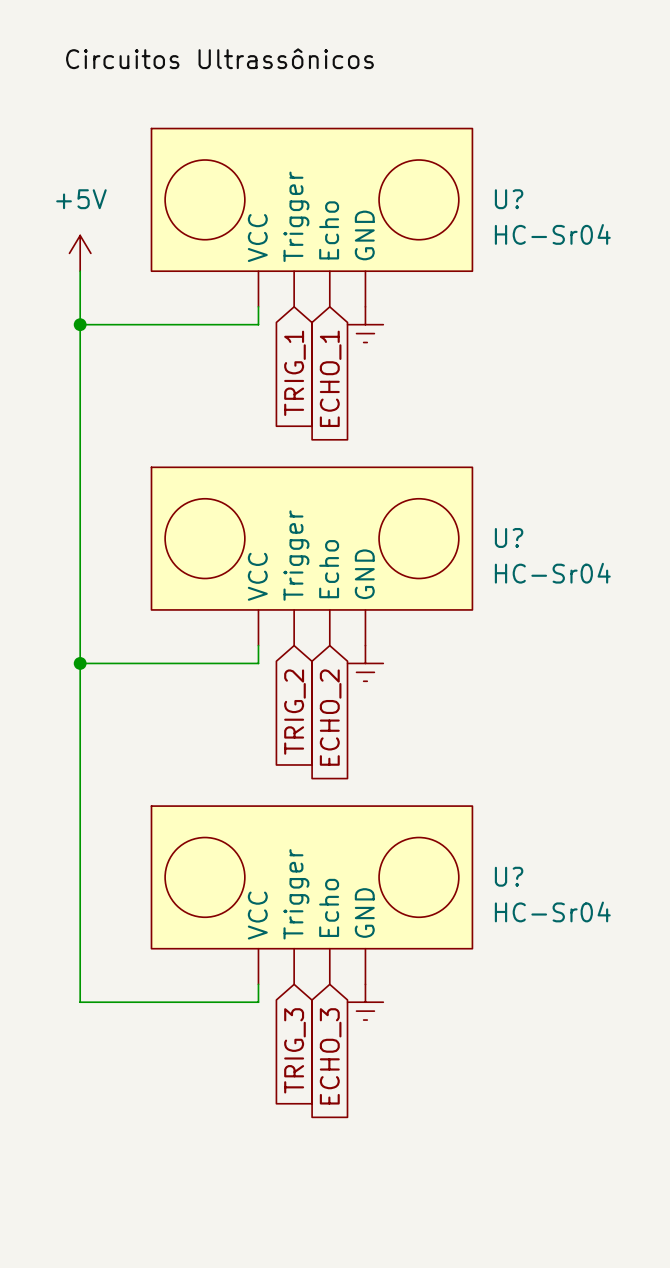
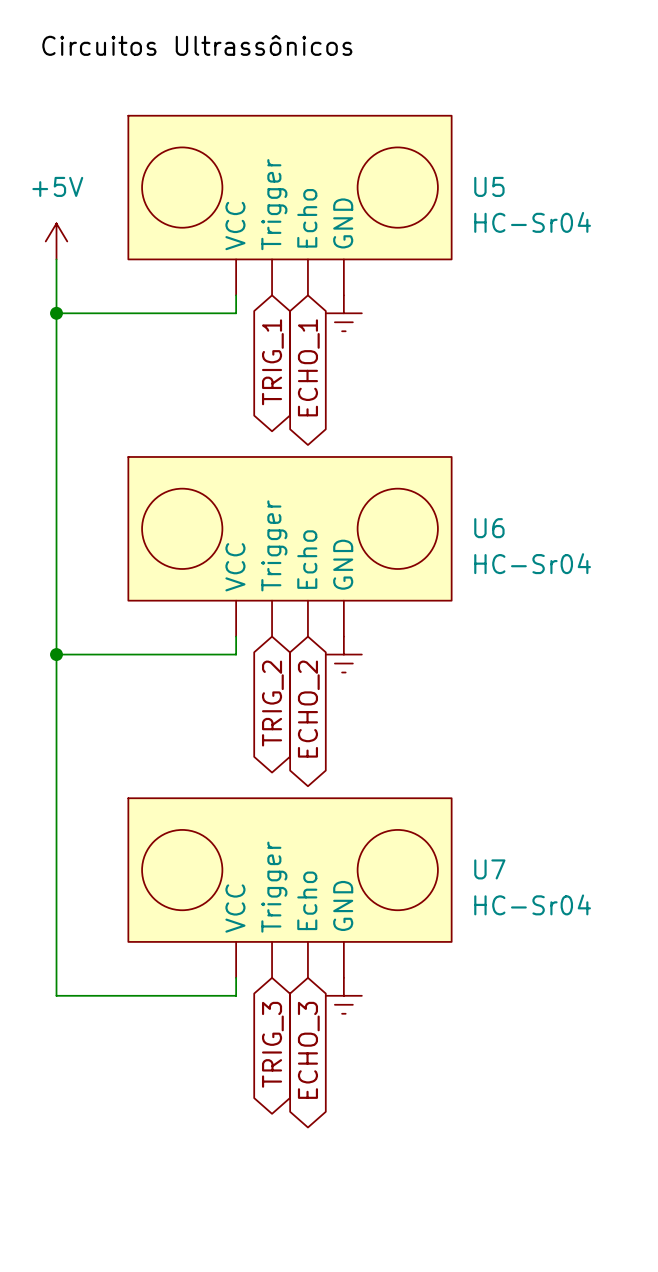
U? name: U? (509, 199) -> U5 (489, 186)
global label shape: input (294, 373) -> bidirectional (272, 362)
global label shape: input (330, 378) -> bidirectional (308, 367)
U? name: U? (509, 537) -> U6 (489, 528)
global label shape: input (294, 712) -> bidirectional (272, 703)
global label shape: input (330, 717) -> bidirectional (308, 709)
U? name: U? (509, 876) -> U7 (489, 869)
global label shape: input (294, 1050) -> bidirectional (272, 1044)
global label shape: input (330, 1056) -> bidirectional (308, 1050)

